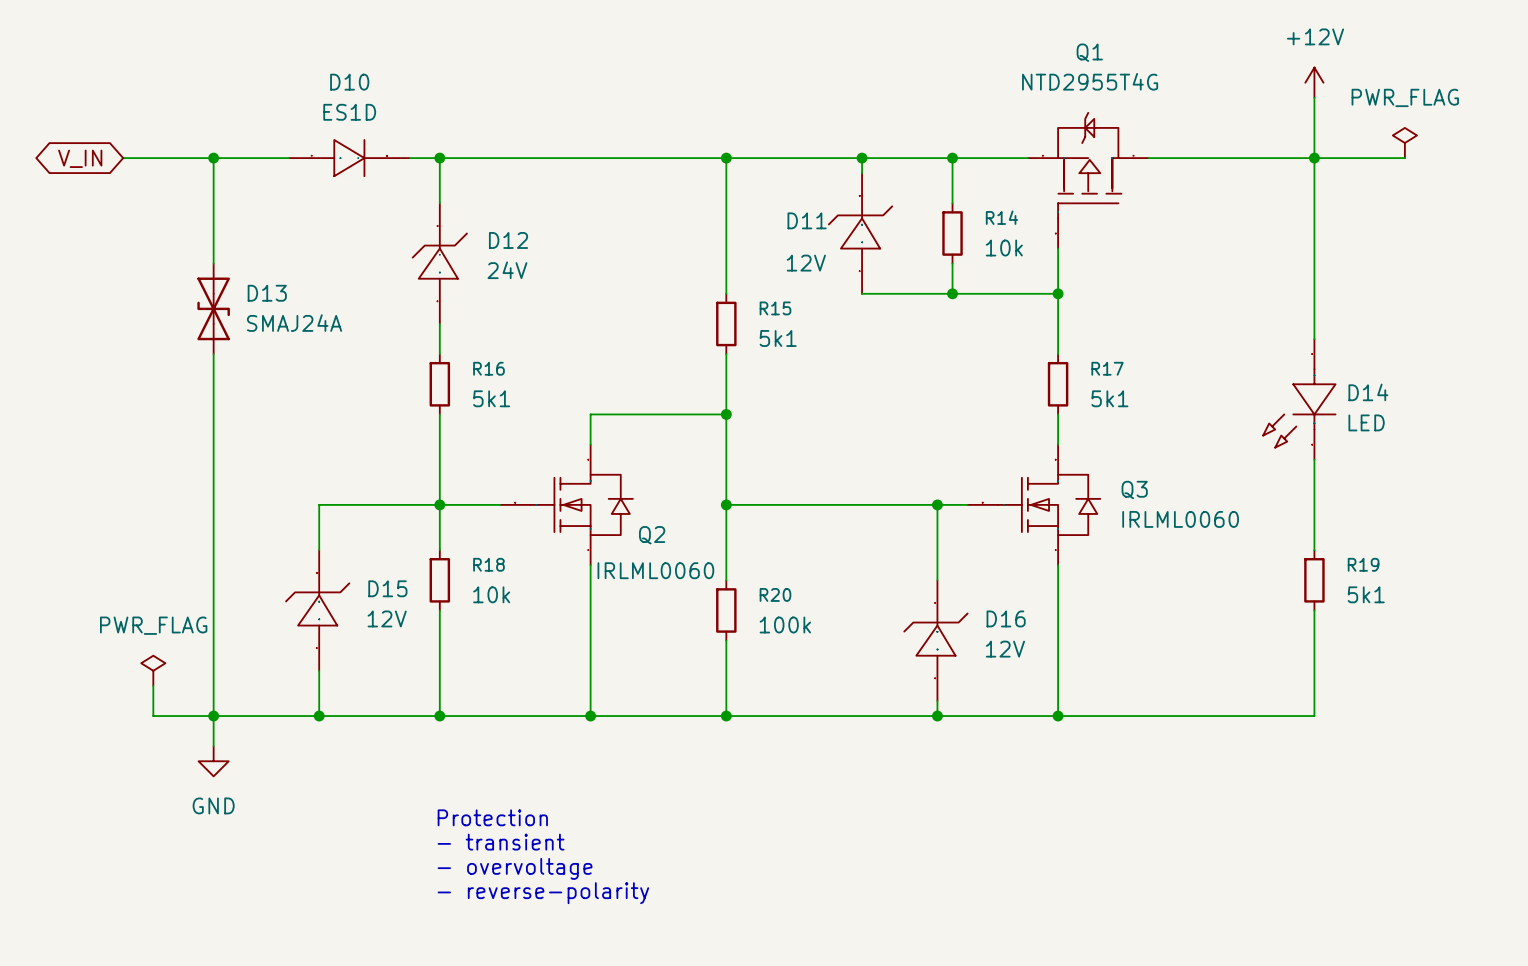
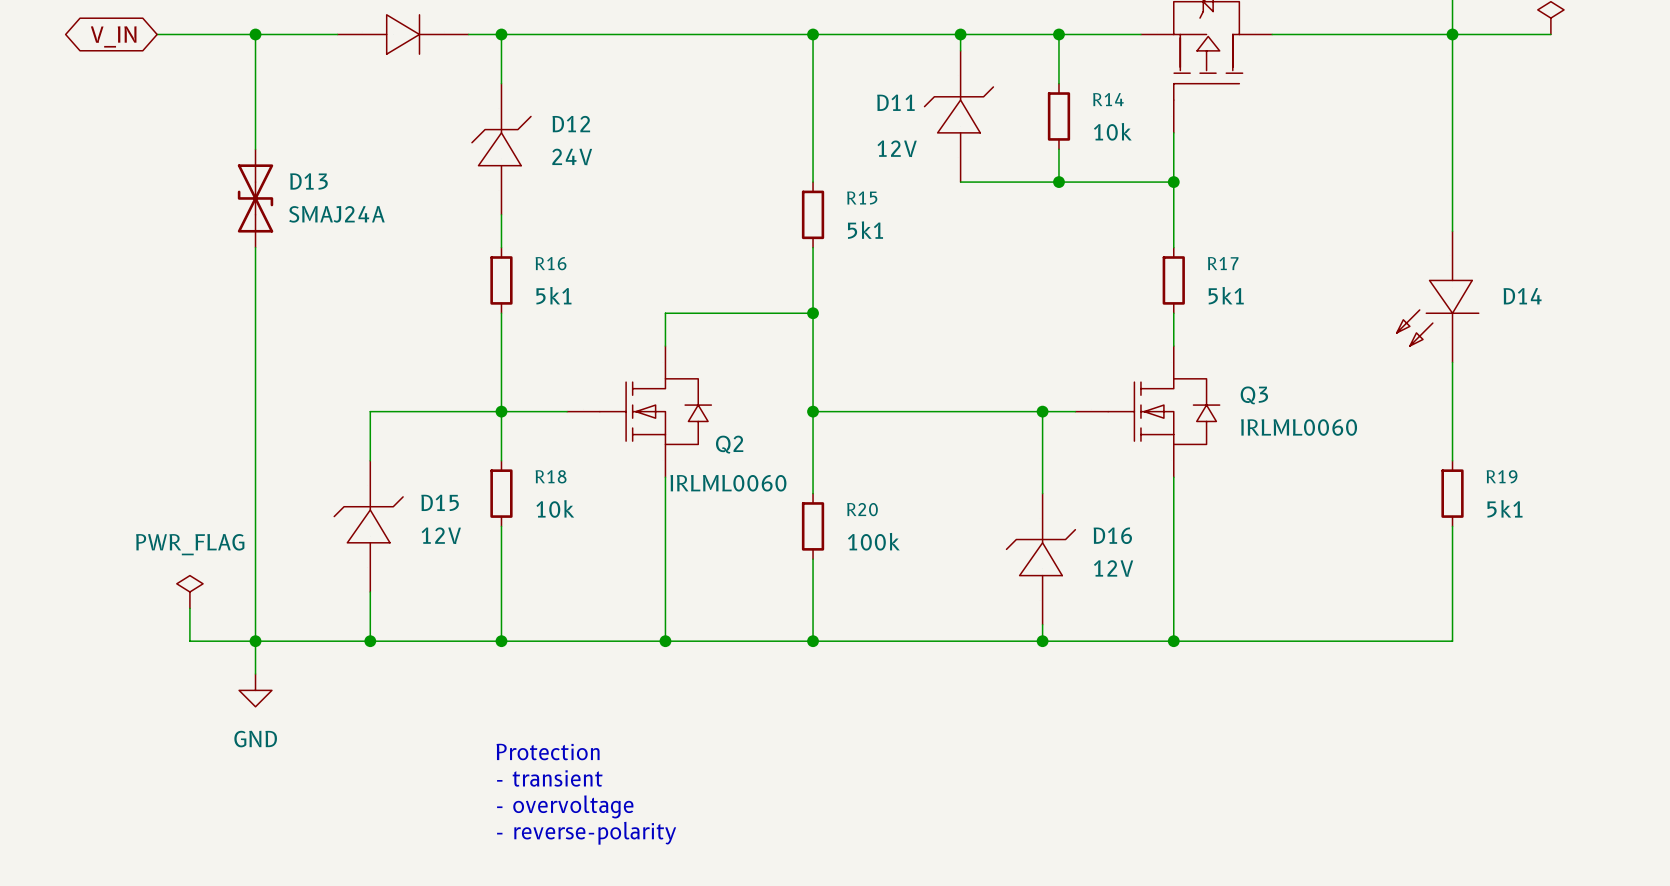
D14 symbol: [1263, 339, 1336, 460] -> [1396, 231, 1479, 363]
D14 value: LED (1366, 422) -> none

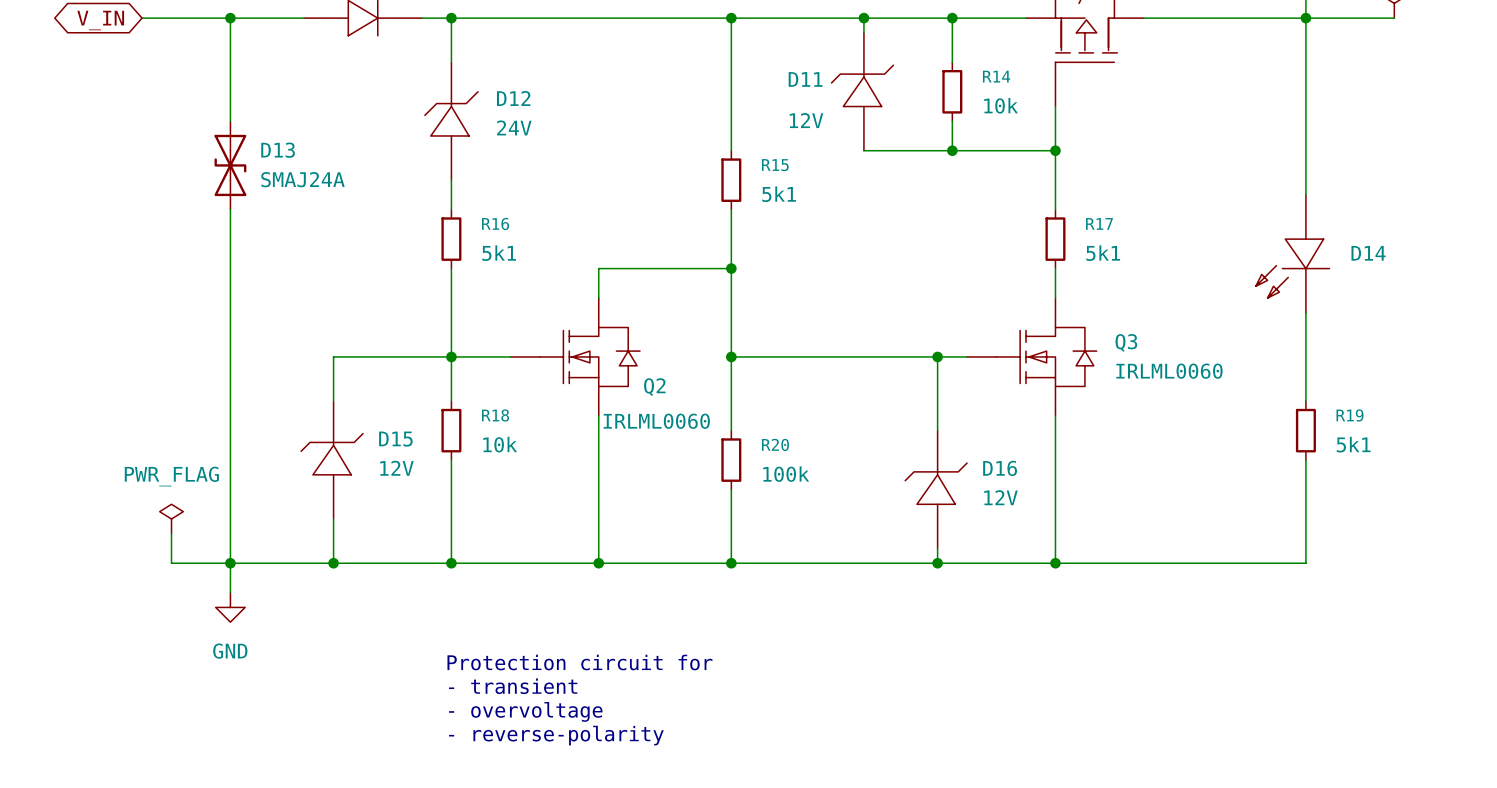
text: Protection (548, 752) -> Protection circuit for (579, 662)

